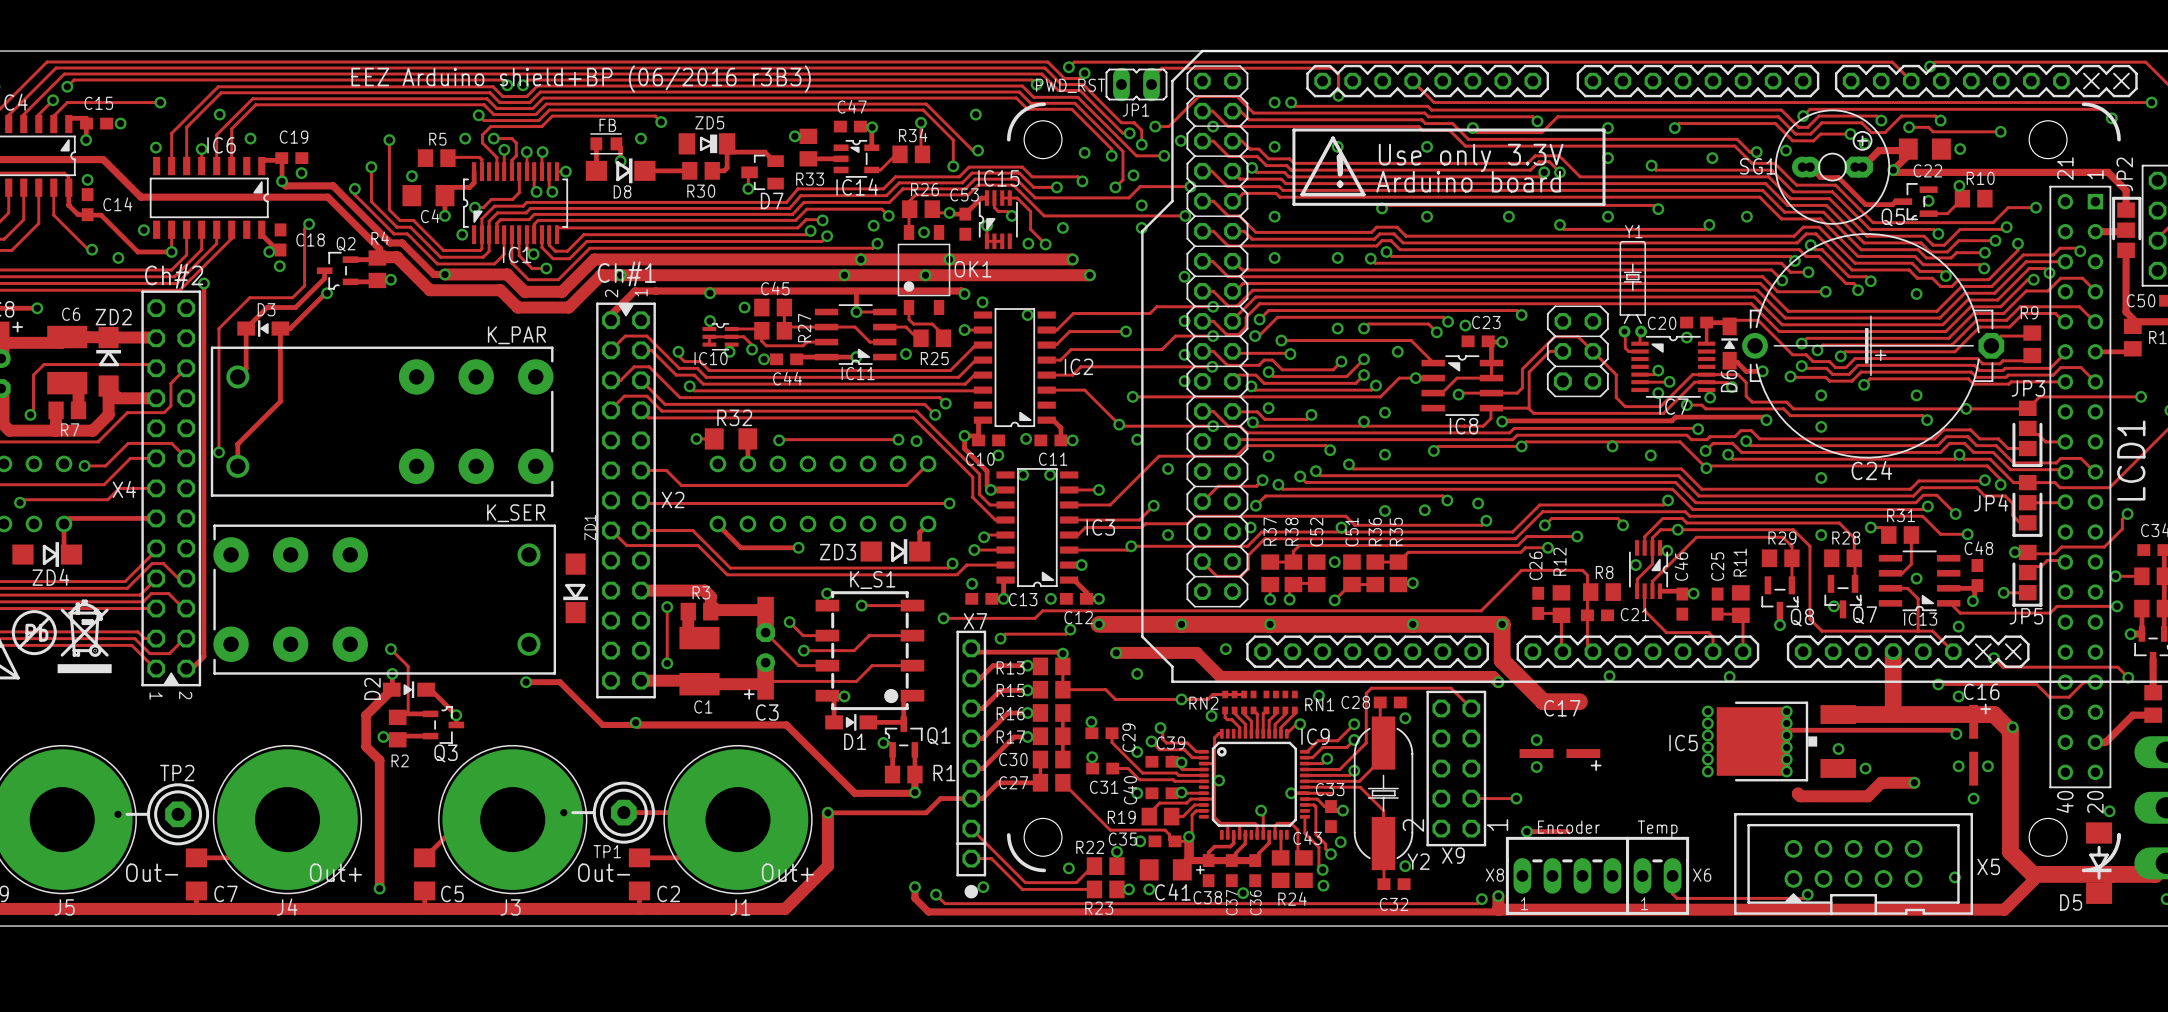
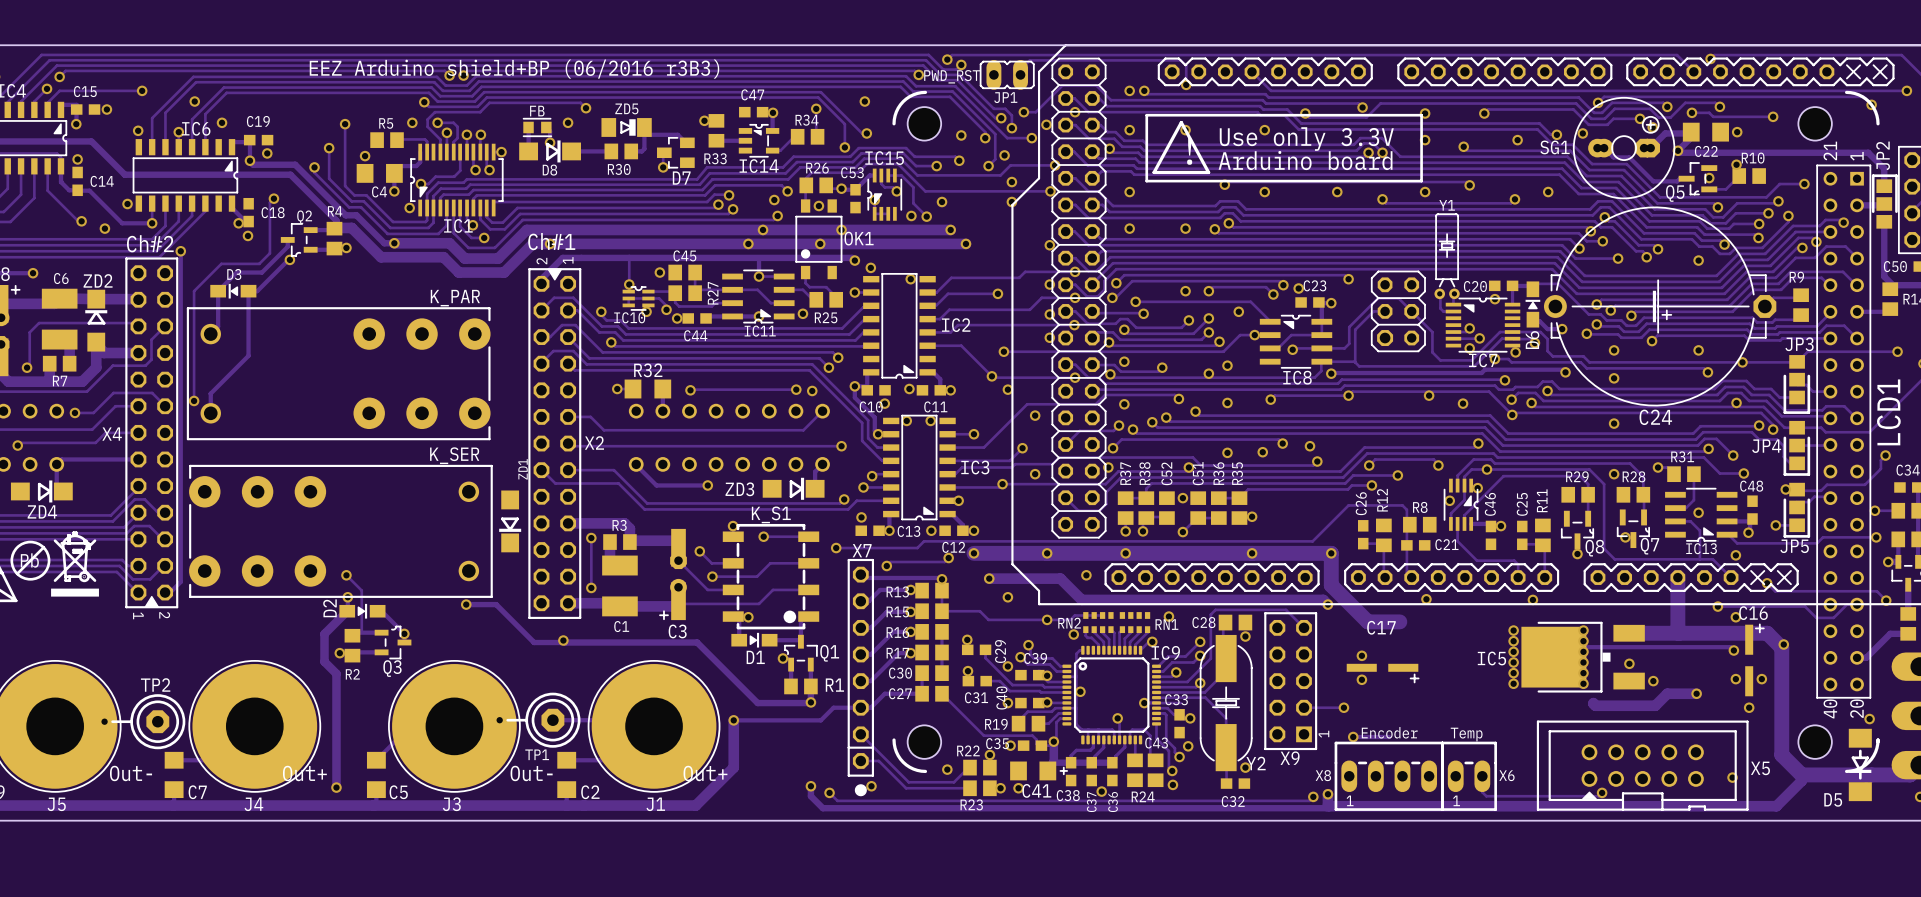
track: none -> (629, 259) (629, 284)
via: (710, 293) -> none
X9 footprint: [1426, 690, 1487, 847] -> [1264, 612, 1318, 751]
C28 footprint: [1373, 696, 1407, 709] -> [1218, 614, 1253, 631]
text: none -> 1 (1323, 734)

